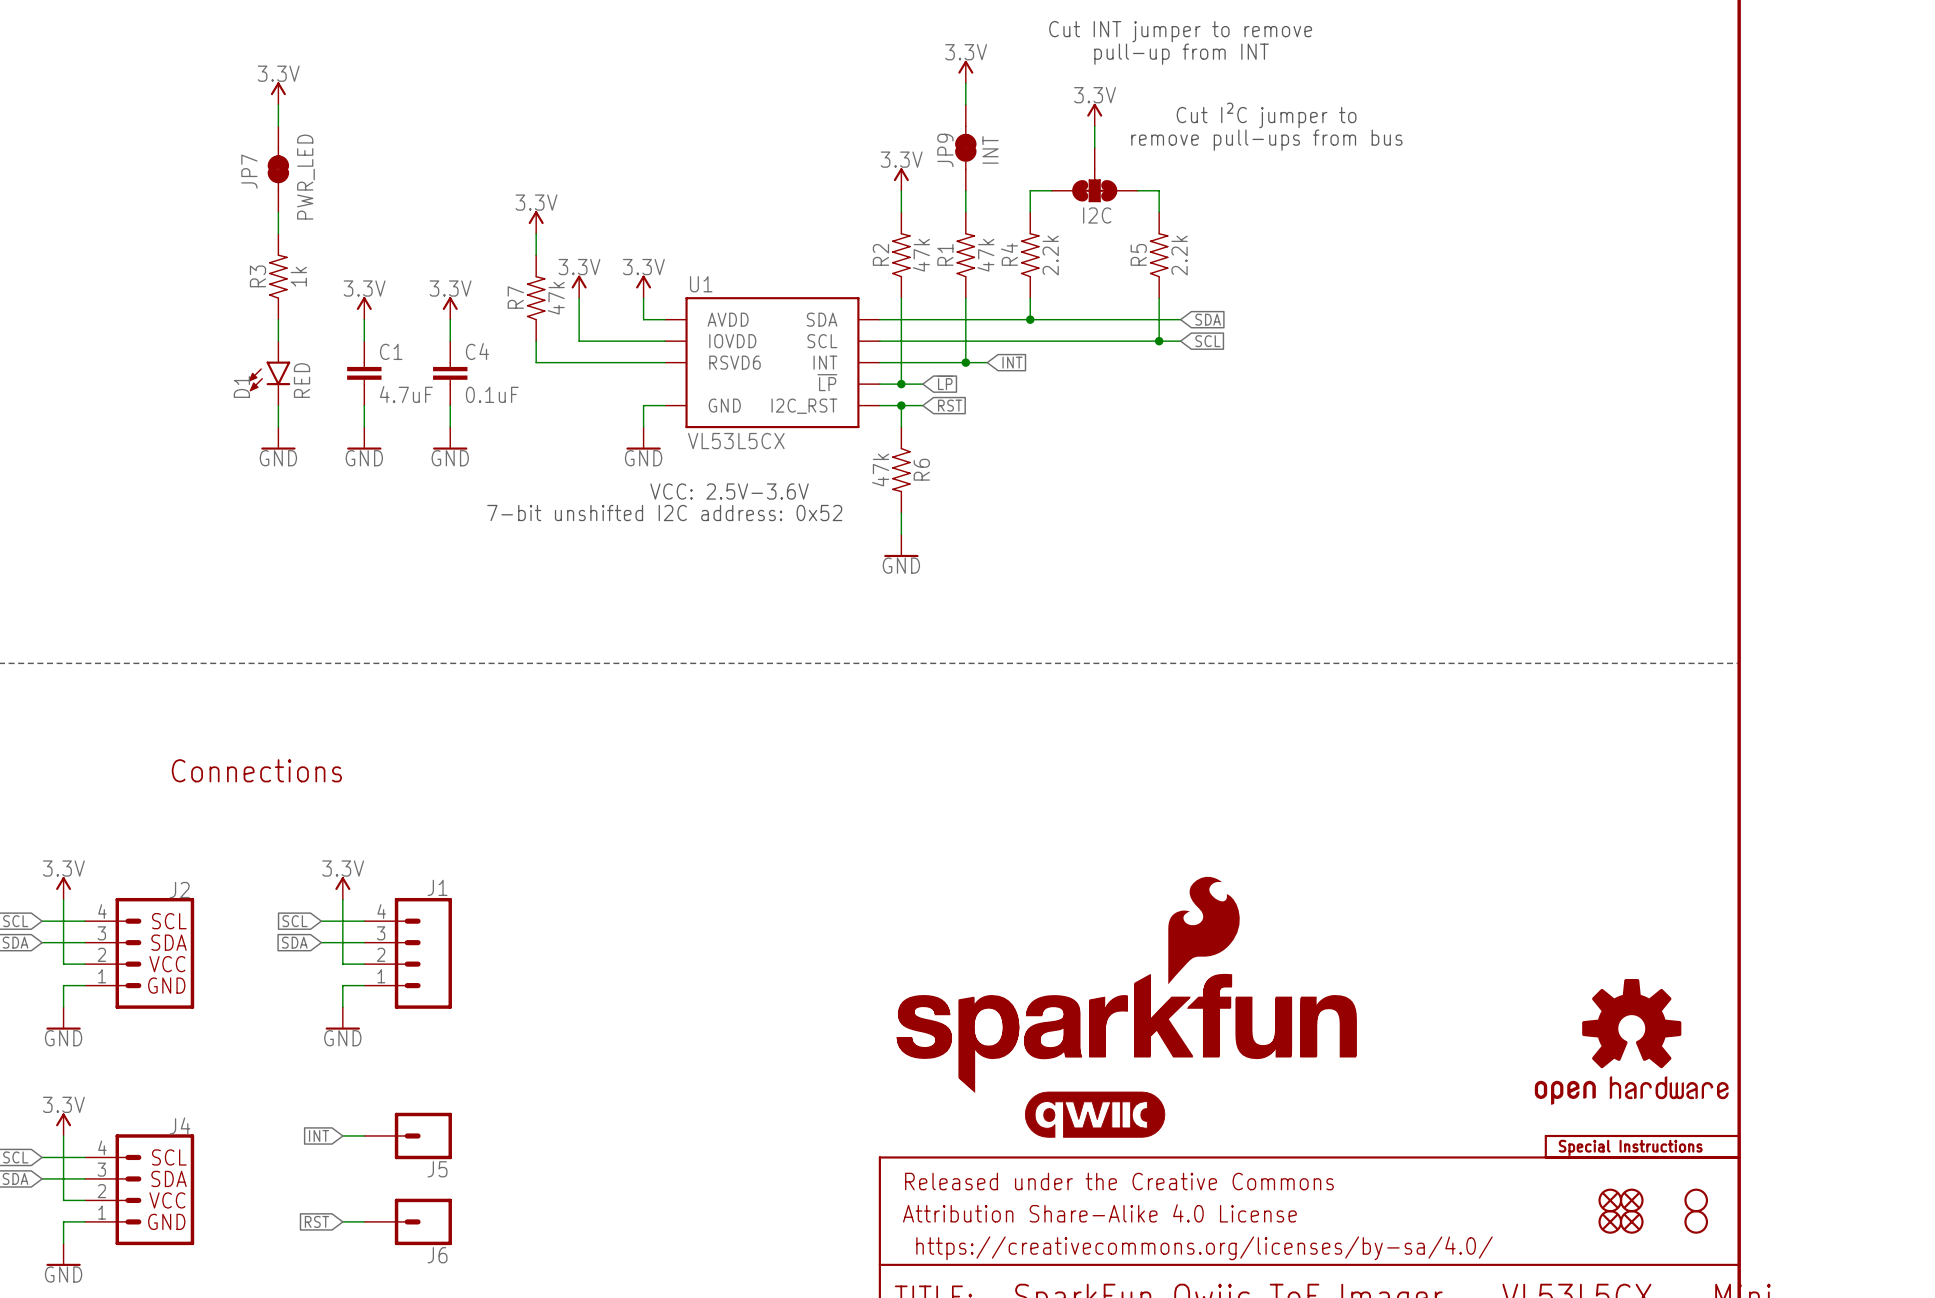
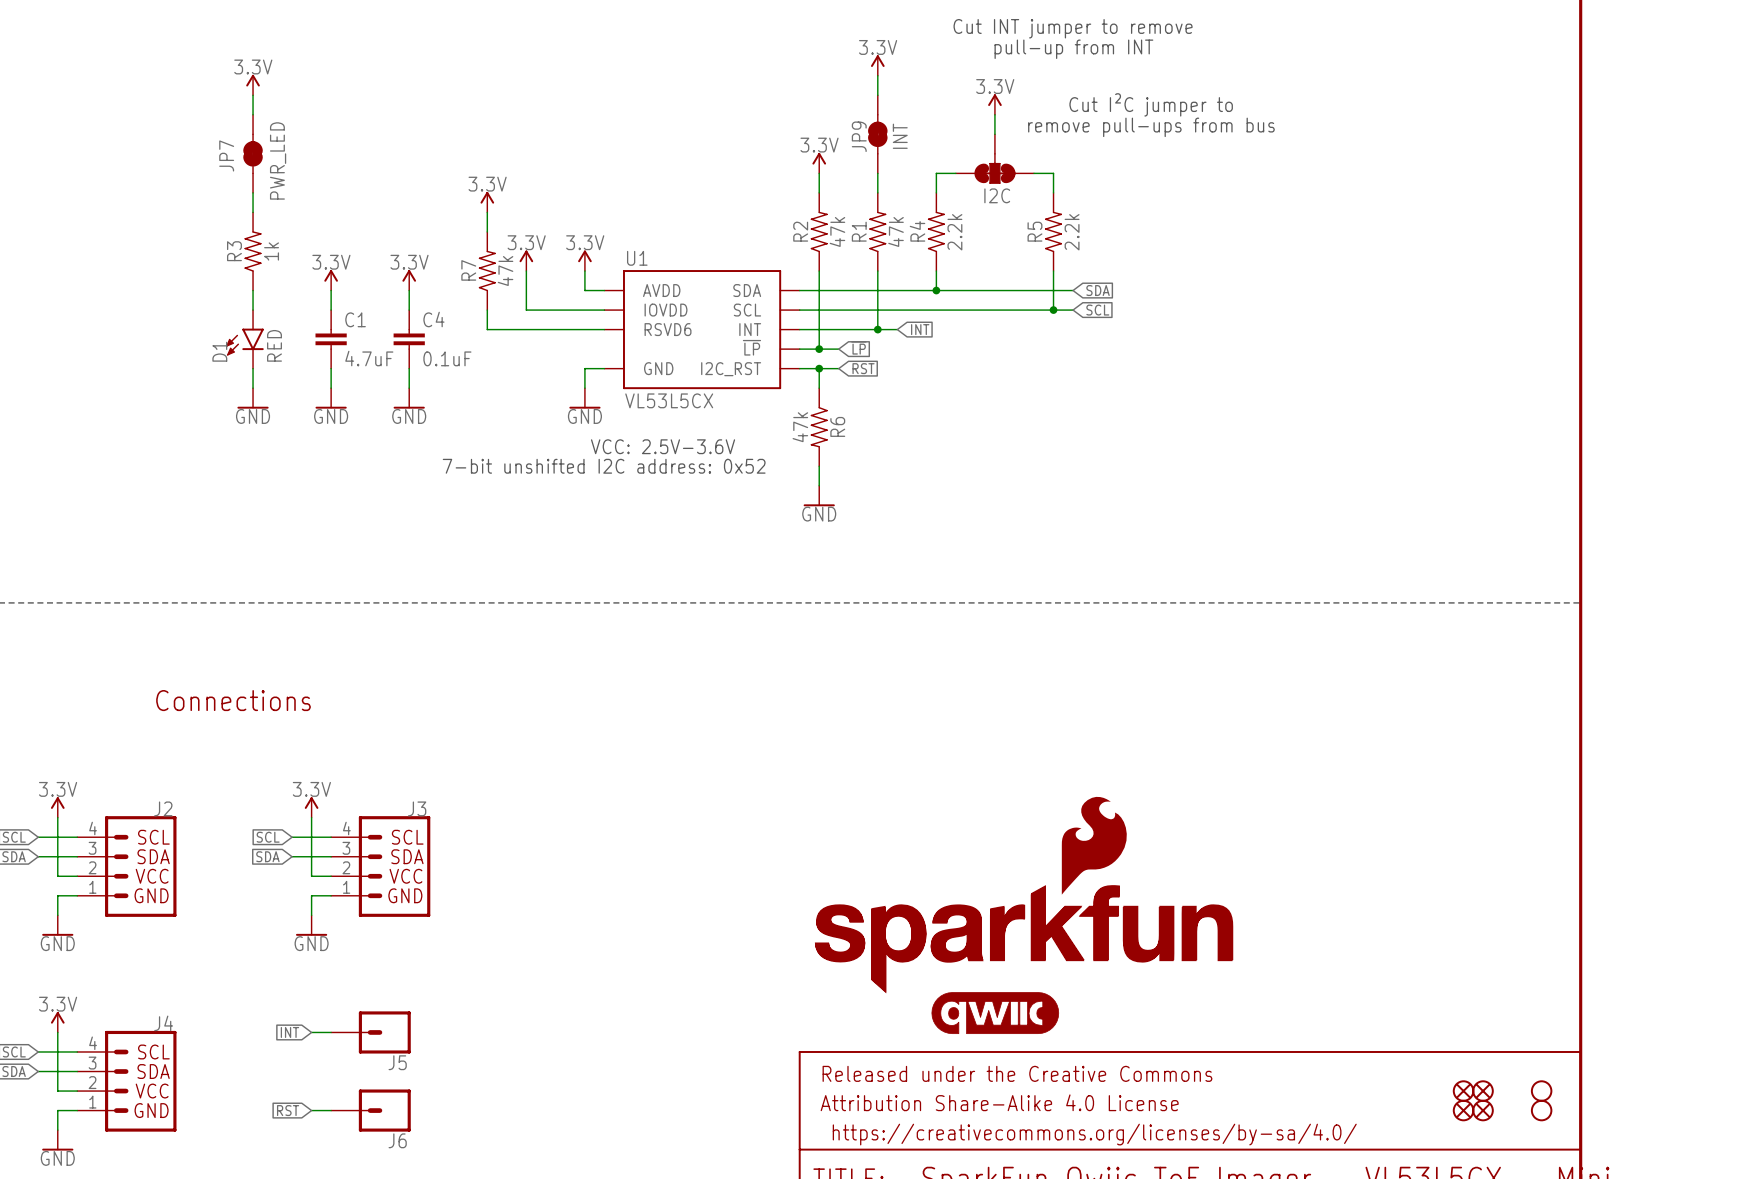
J1: (408, 953) -> none
J3: none -> (380, 866)
part: (1631, 1041) -> none
part: (1642, 1146) -> none

